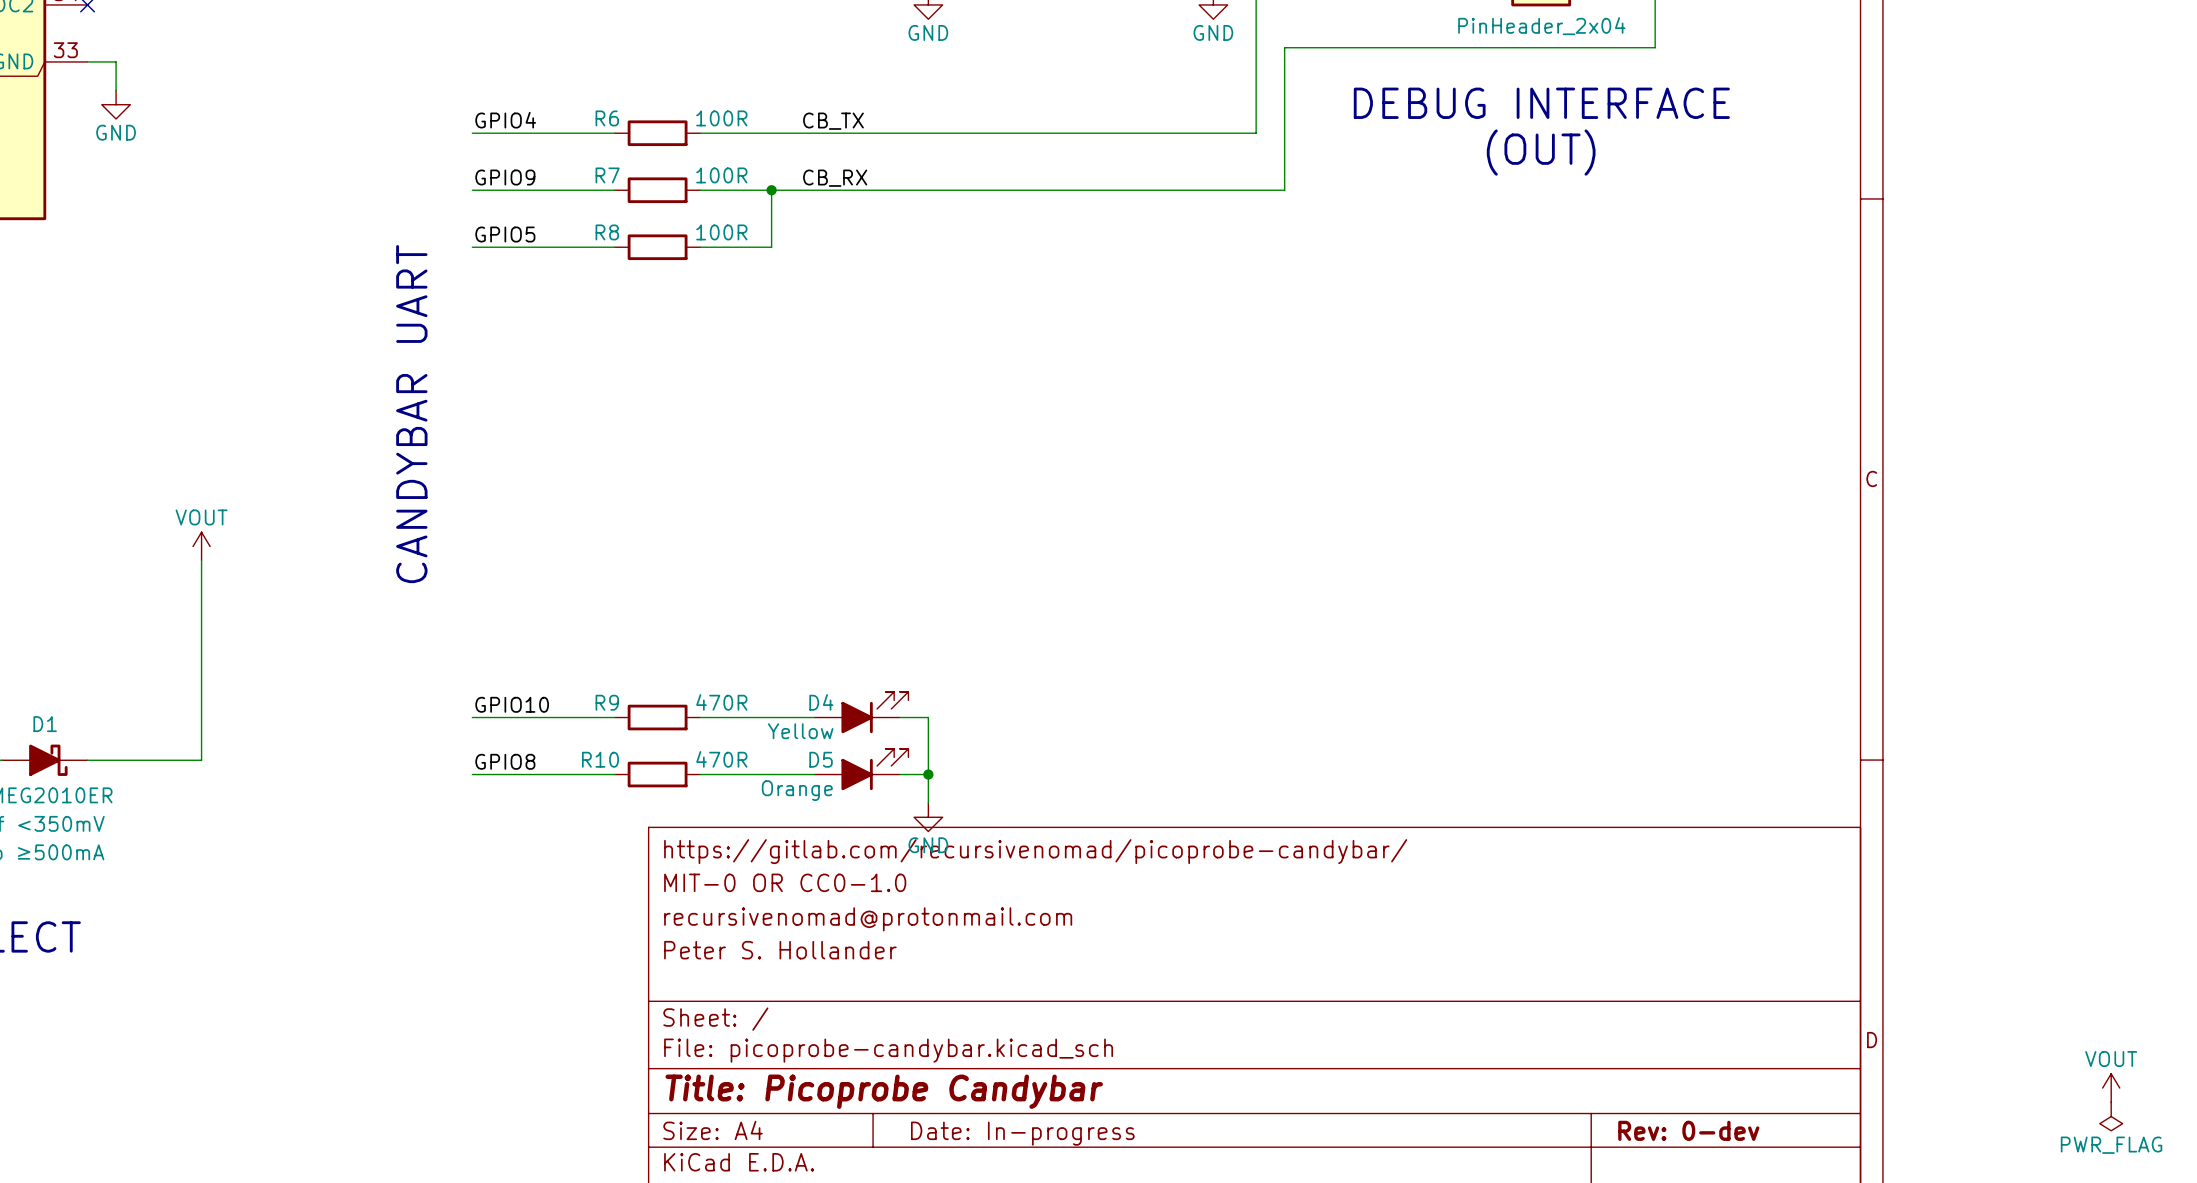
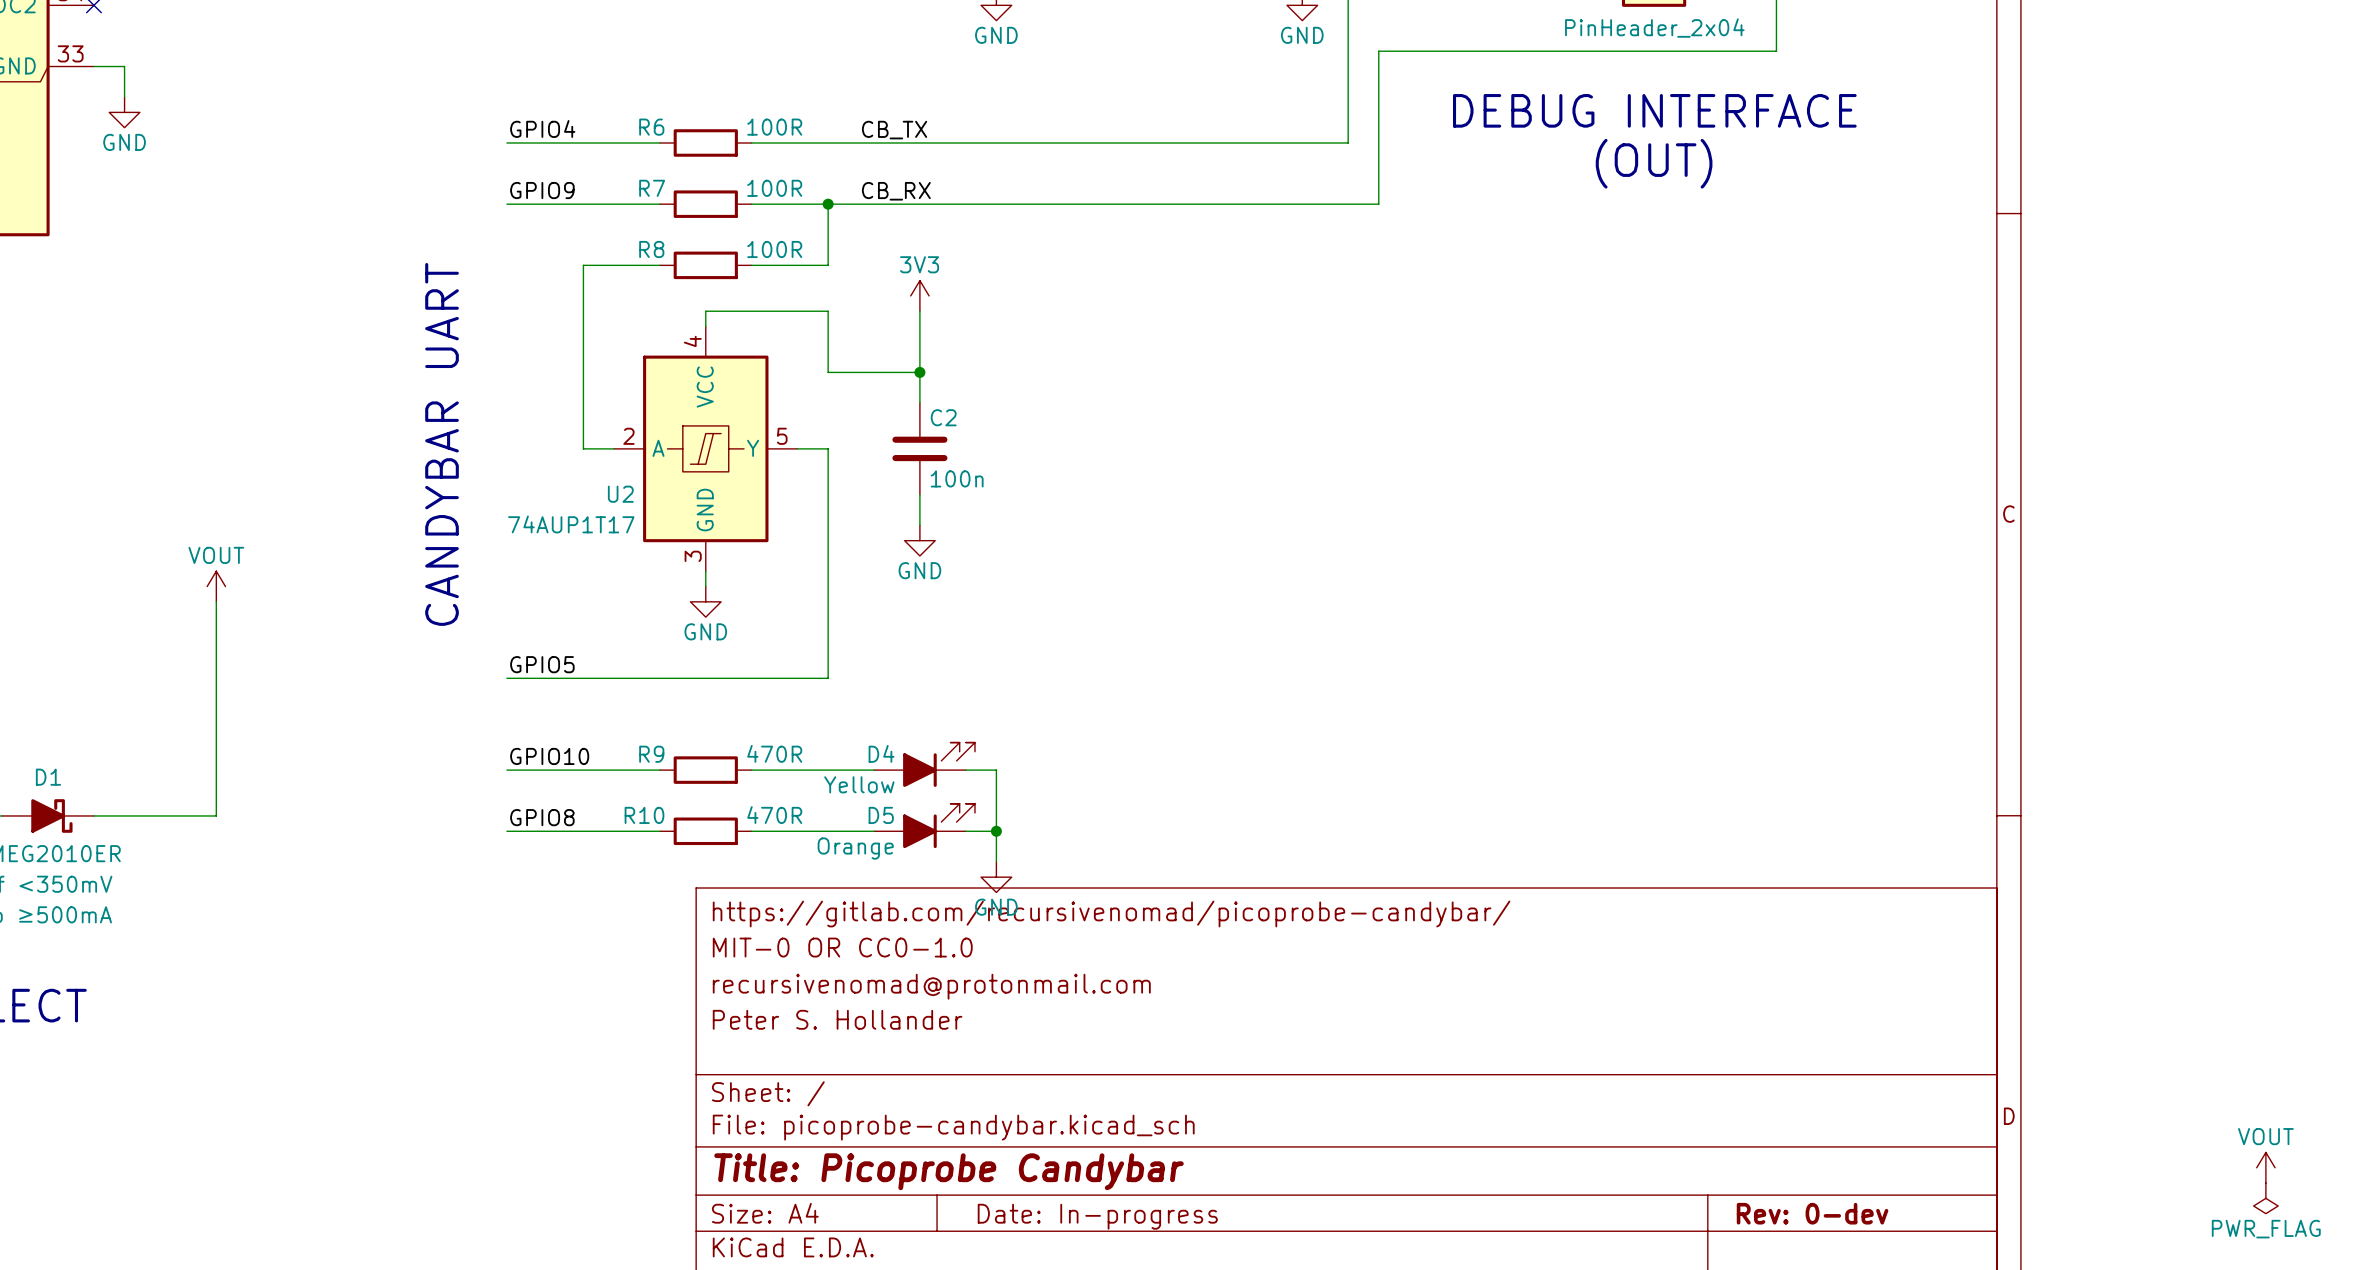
label: GPIO5 (505, 234) -> none
wire: (472, 247) (543, 247) -> (614, 448) (583, 448) (583, 265)
power symbol: none -> 3V3 (919, 295)
wire: none -> (919, 311) (919, 403)
wire: none -> (705, 326) (705, 311) (828, 311) (828, 372) (919, 372)
junction: none -> (919, 372)
U2: none -> 74AUP1T17 (705, 448)
wire: none -> (797, 448) (828, 448) (828, 678) (506, 678)
C2: none -> 100n (919, 448)
wire: none -> (919, 494) (919, 525)
power symbol: none -> GND (919, 540)
wire: none -> (705, 571) (705, 586)
power symbol: none -> GND (705, 601)
label: none -> GPIO5 (542, 664)

